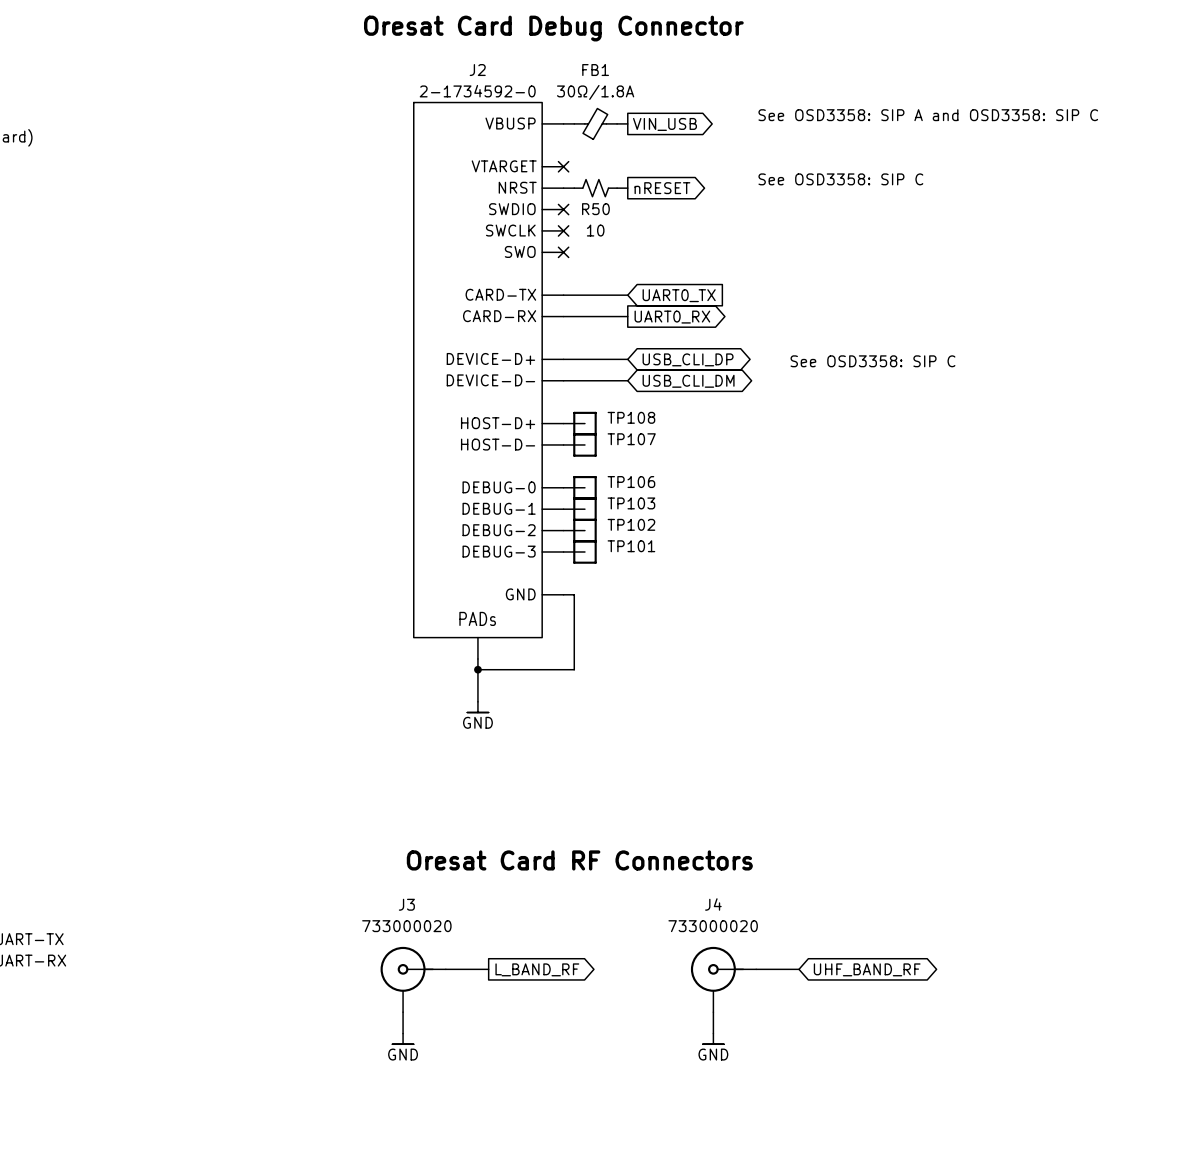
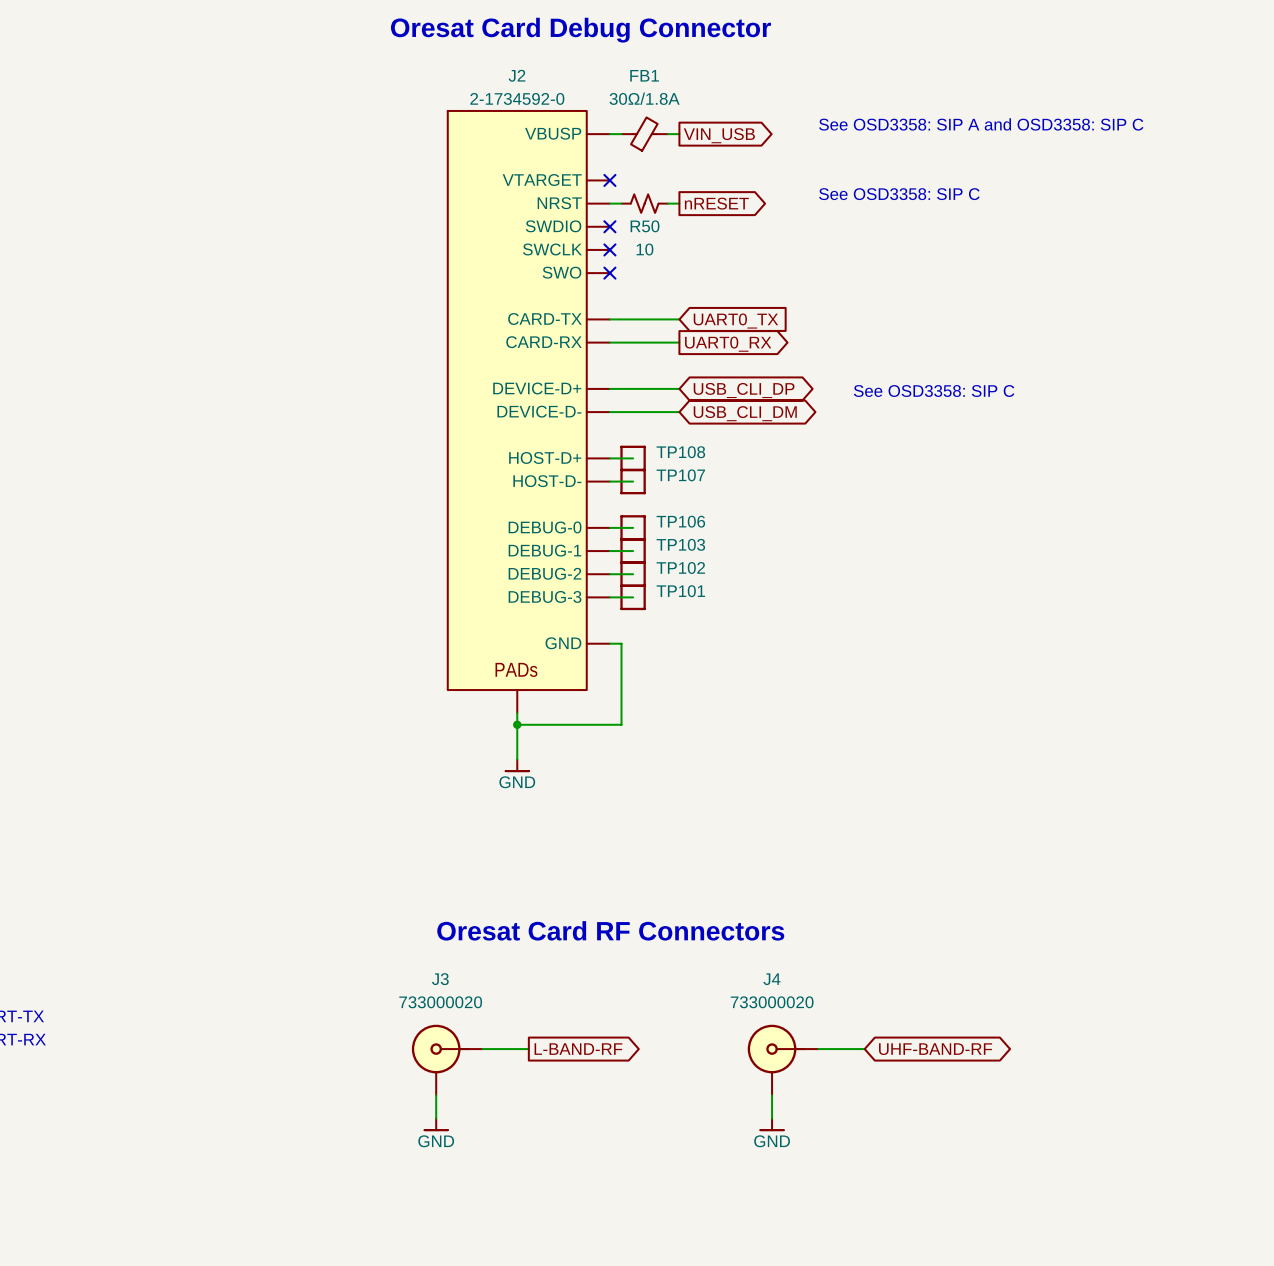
global label: L_BAND_RF (537, 969) -> L-BAND-RF (578, 1049)
global label: UHF_BAND_RF (867, 969) -> UHF-BAND-RF (935, 1049)

